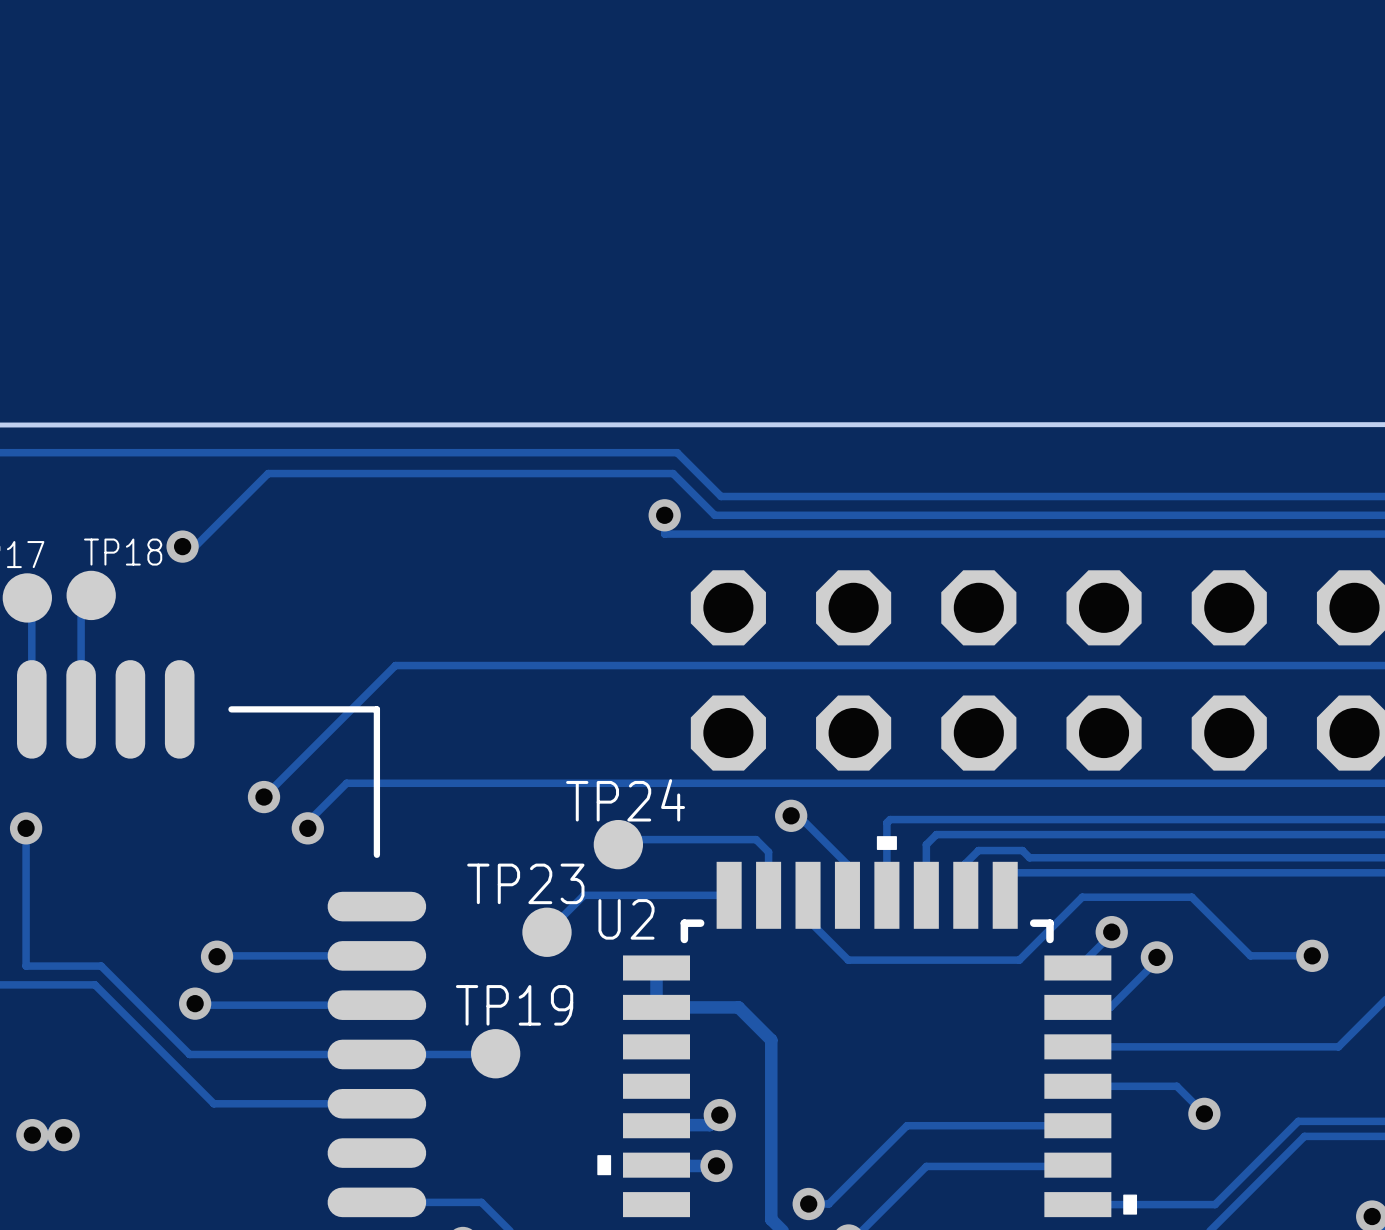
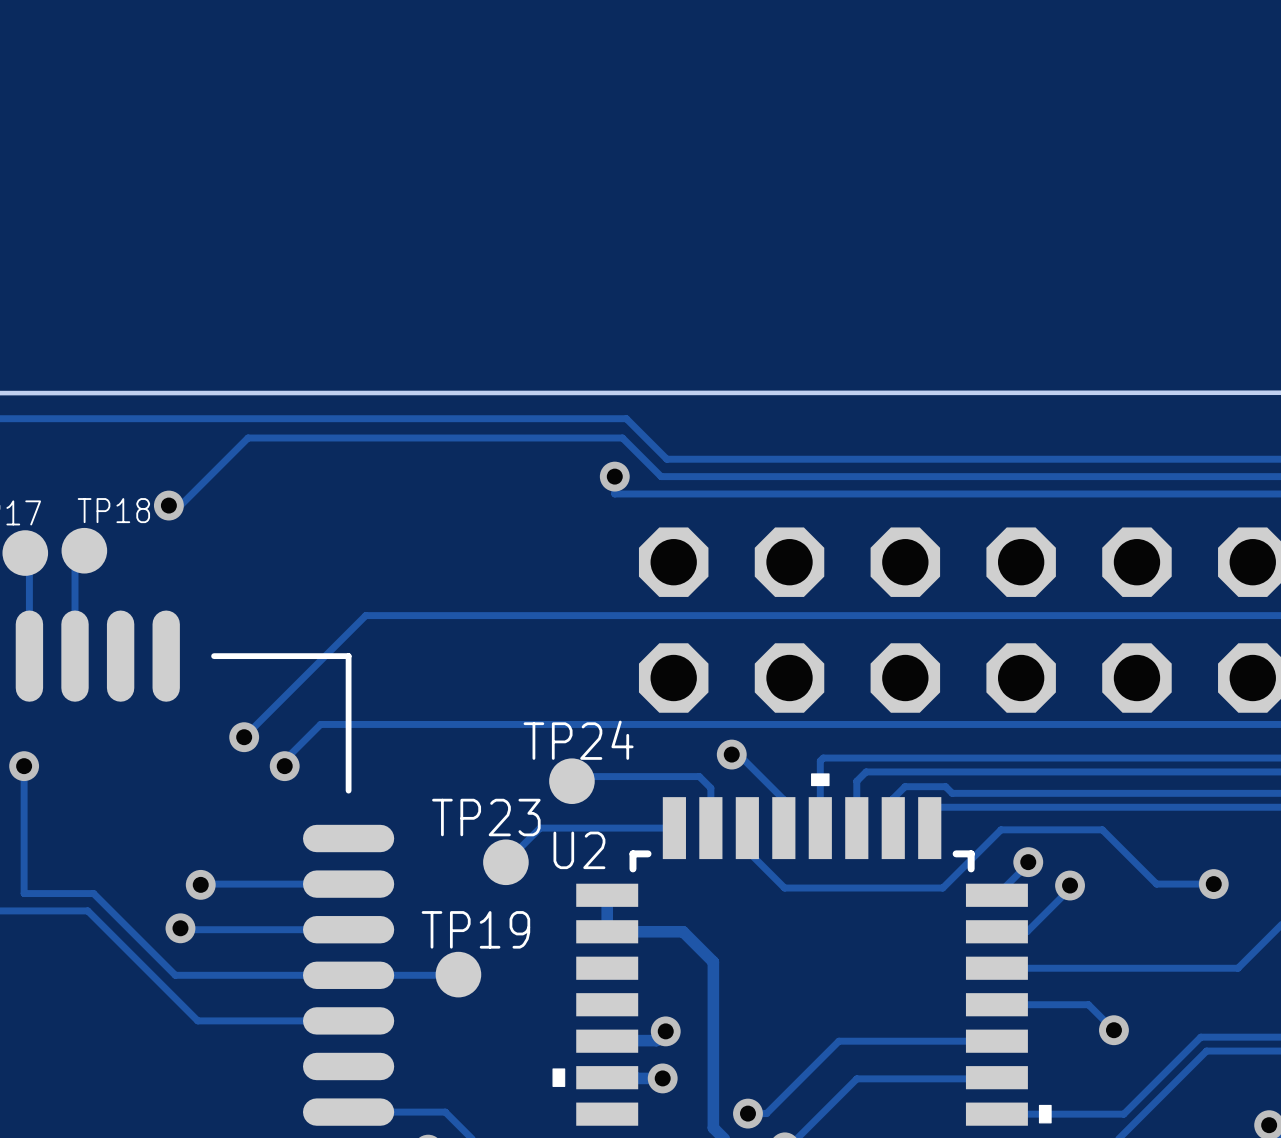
via: (32, 1135) -> none
via: (63, 1135) -> none

